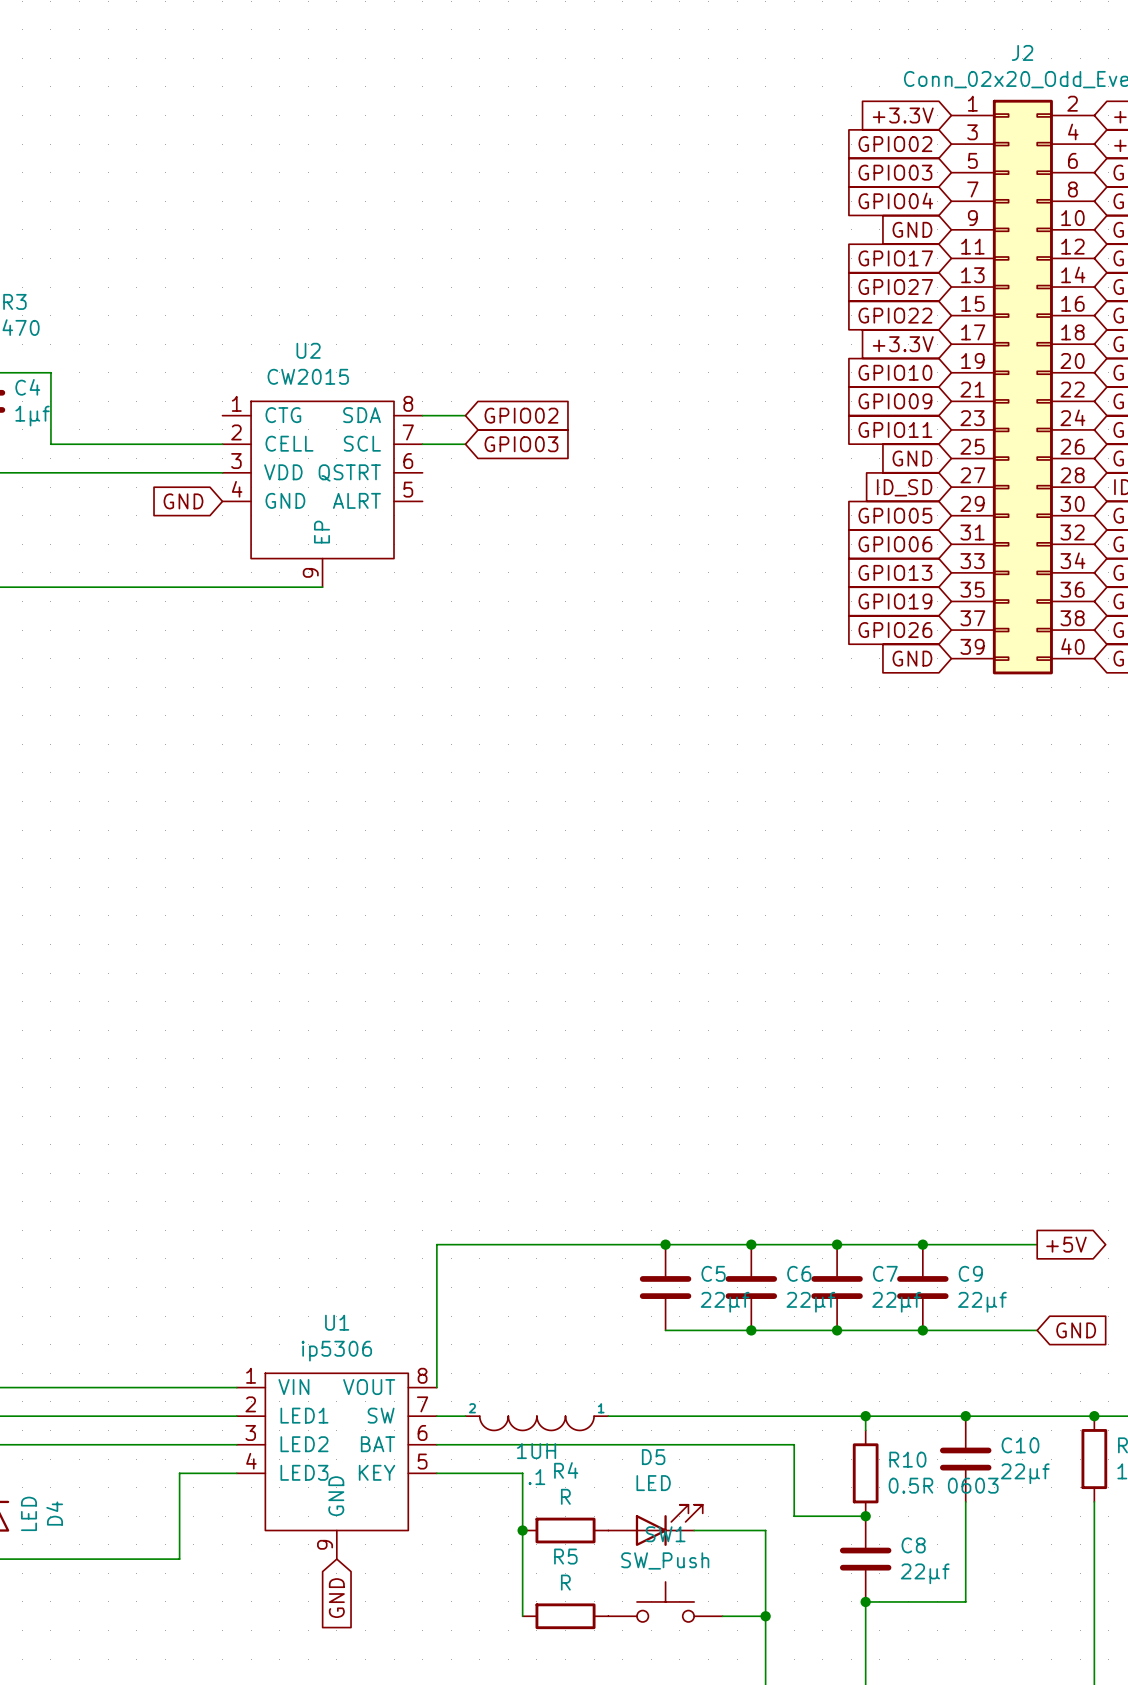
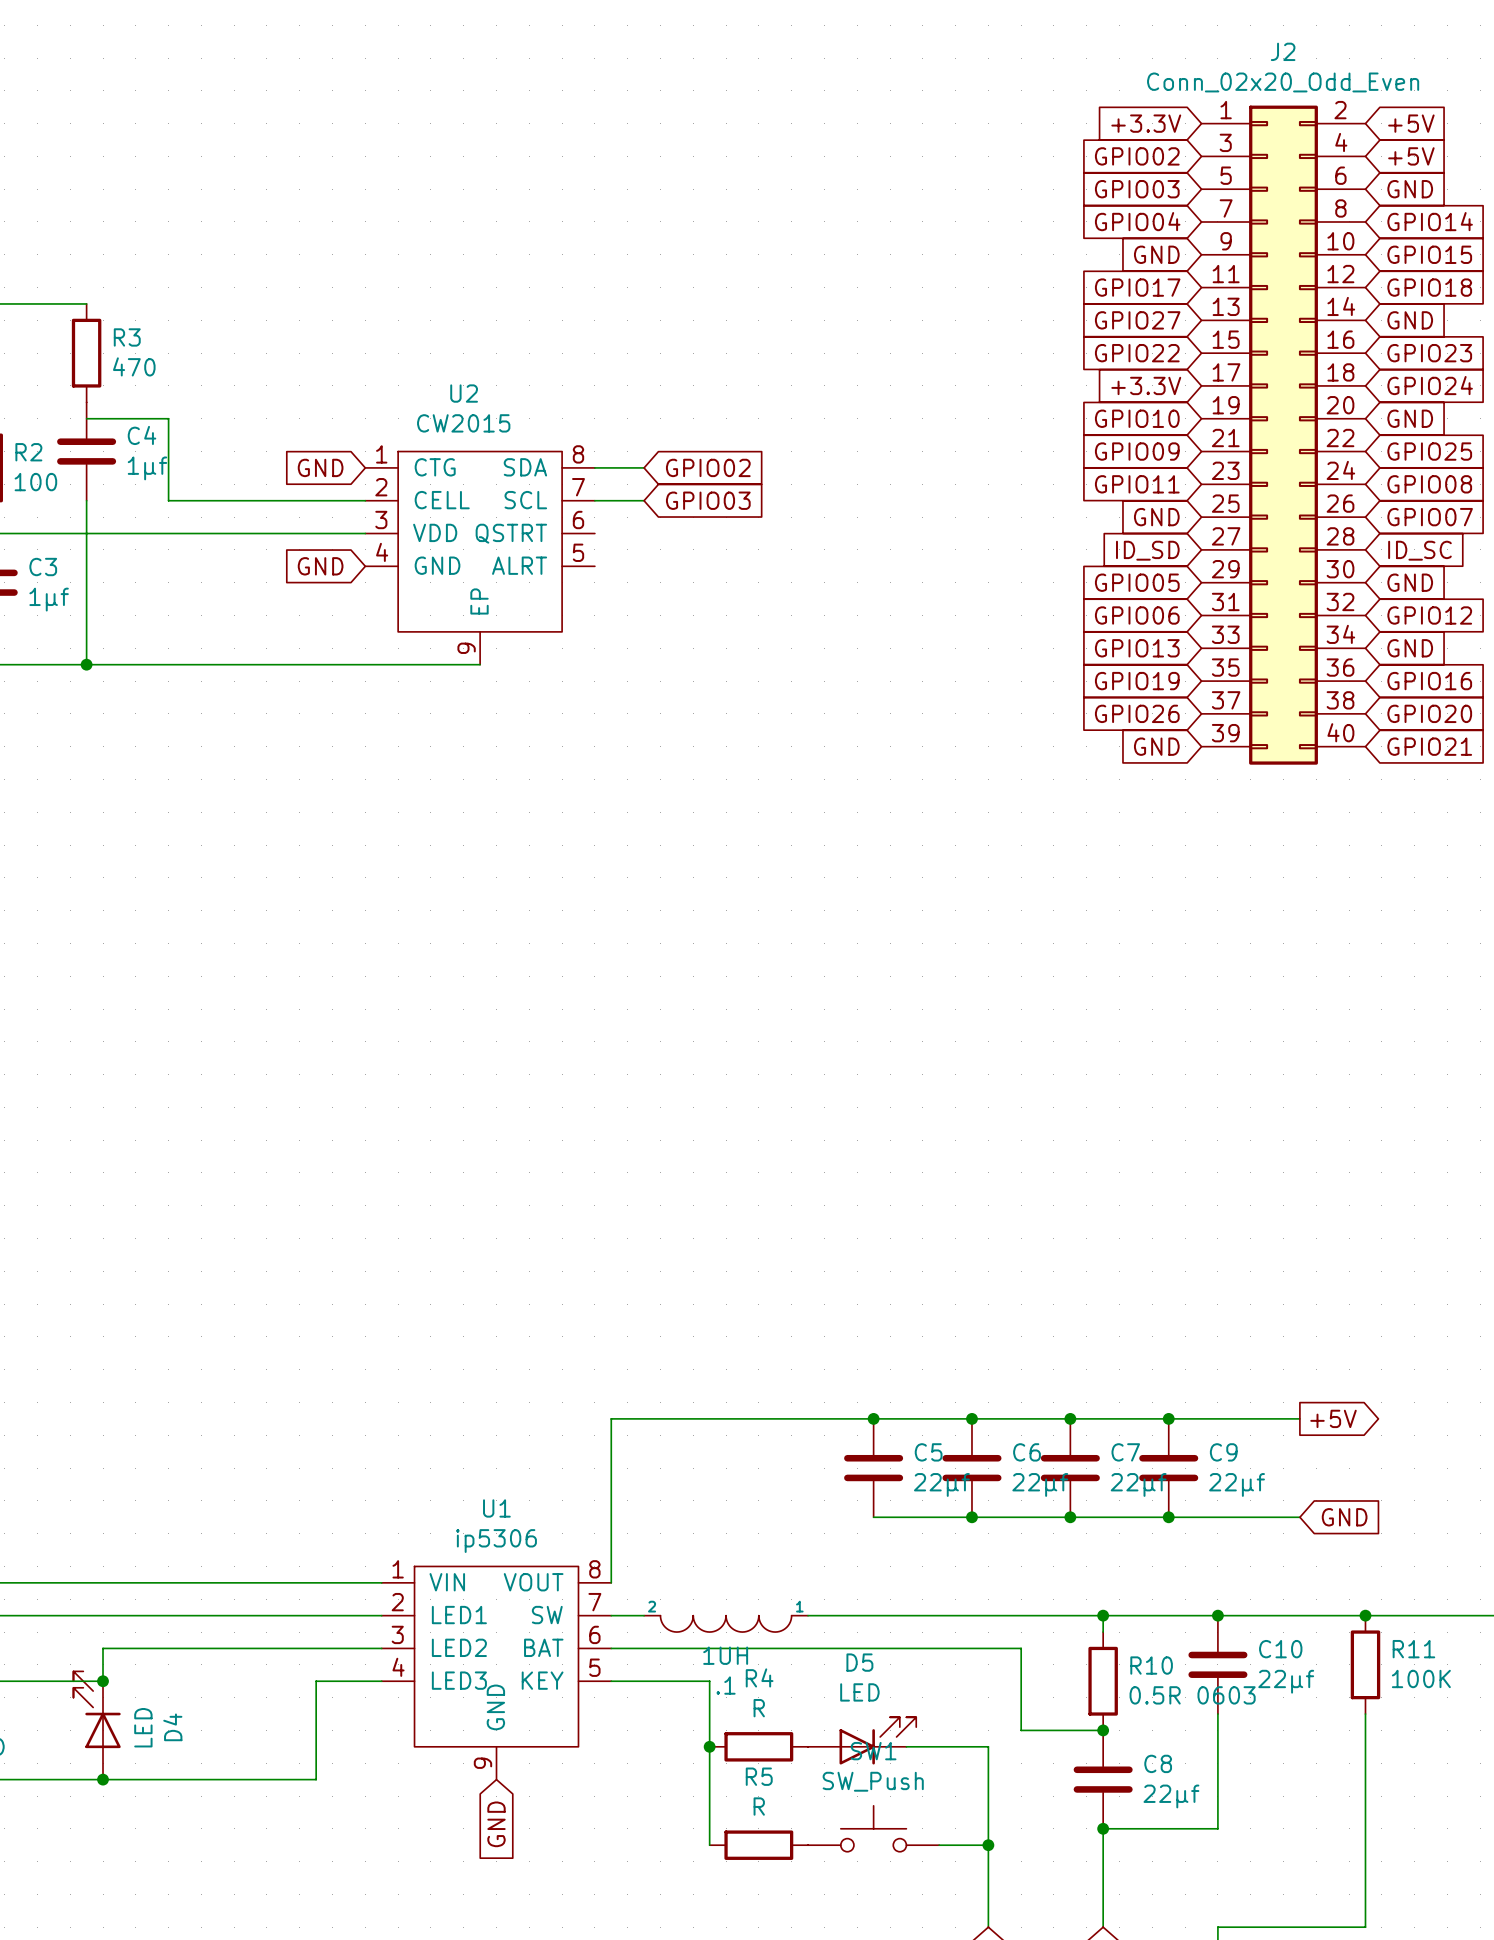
global label: none -> GND (320, 467)

